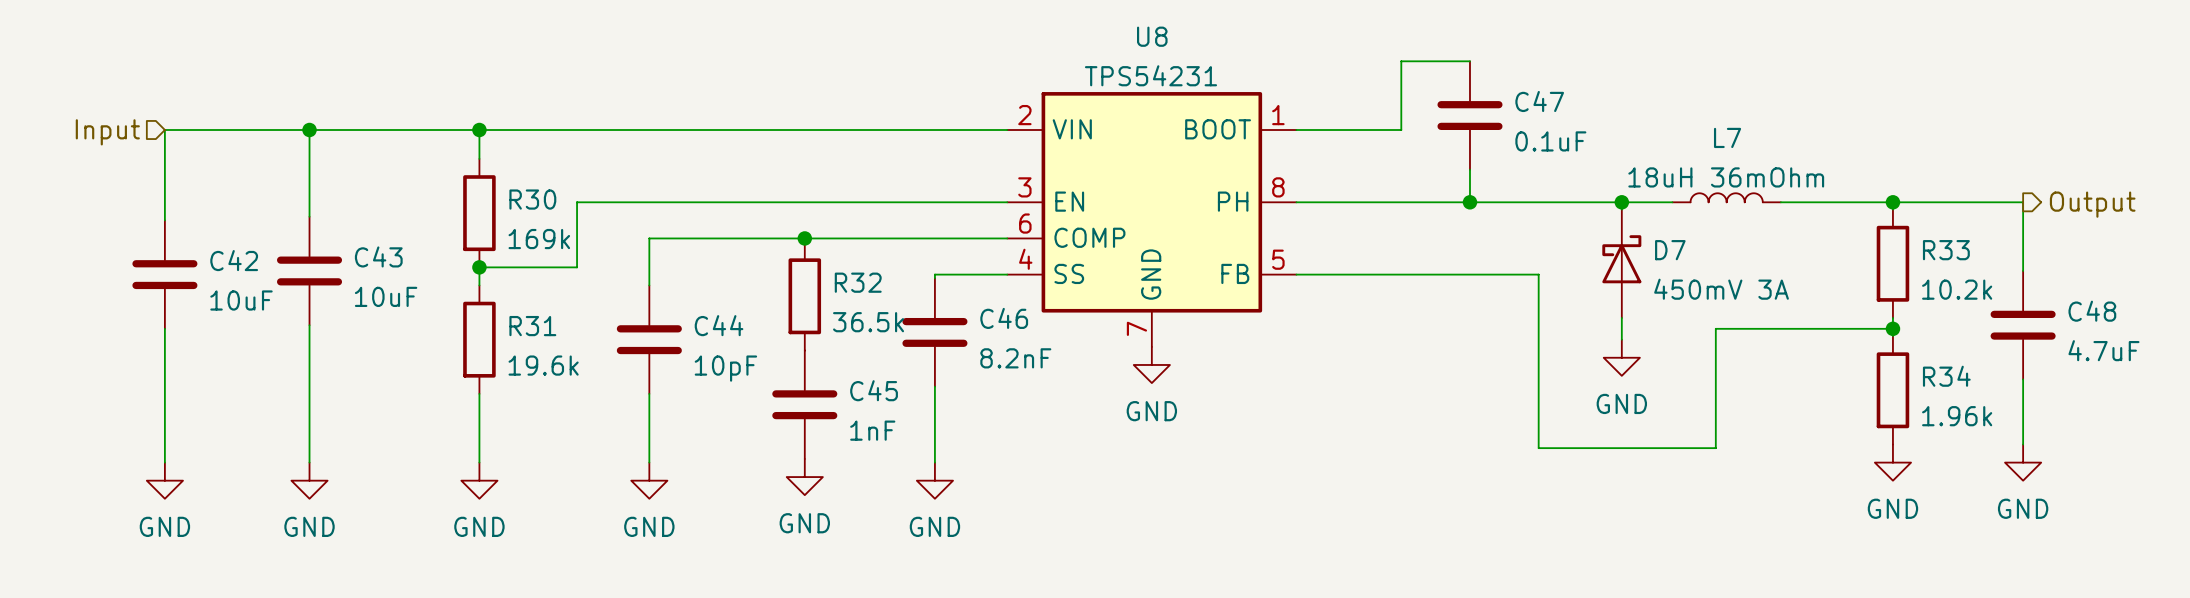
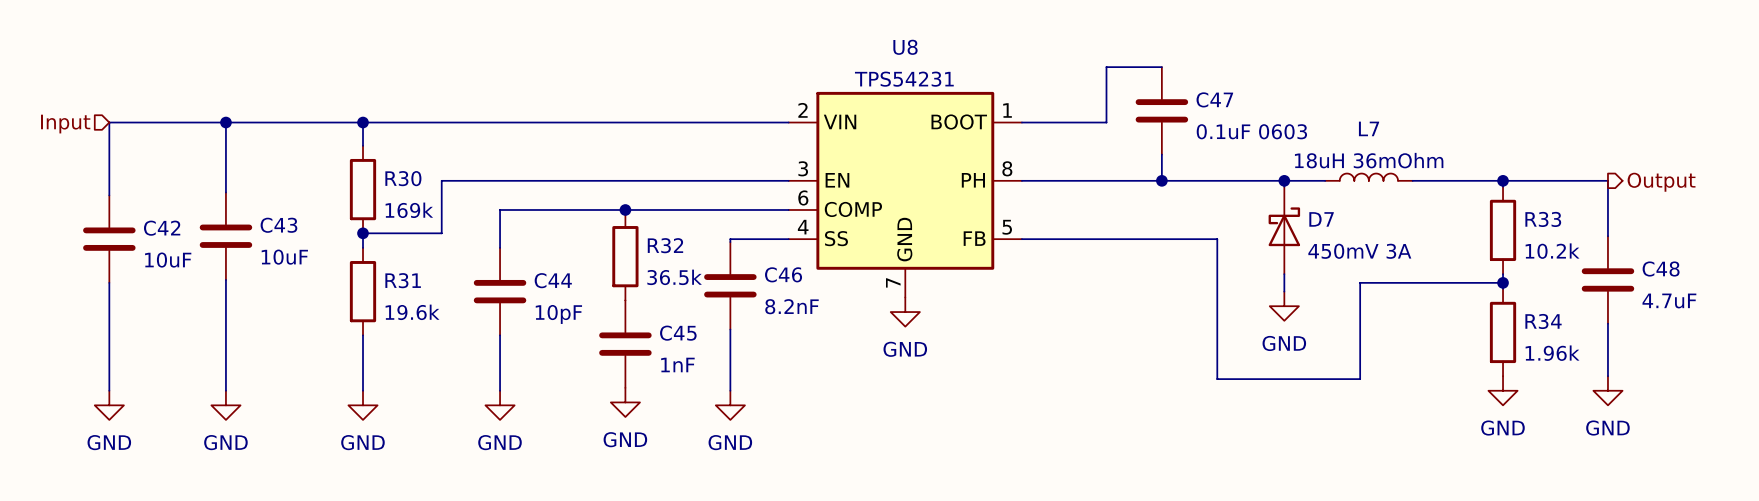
C47 value: 0.1uF (1550, 141) -> 0.1uF 0603 (1251, 131)

